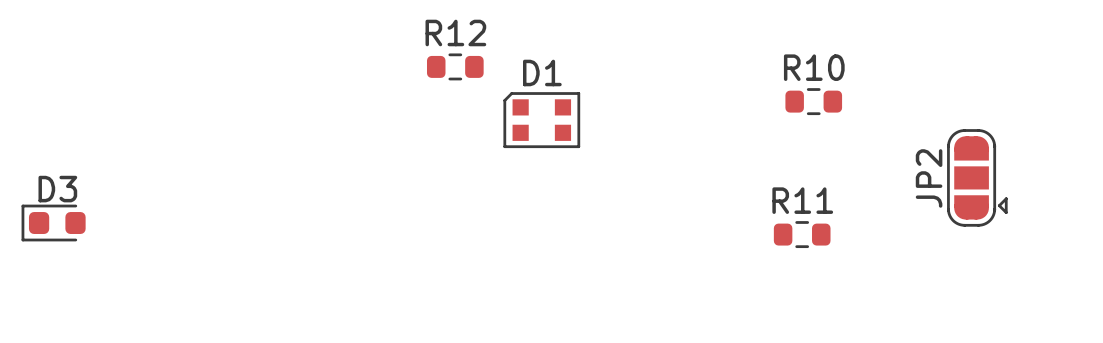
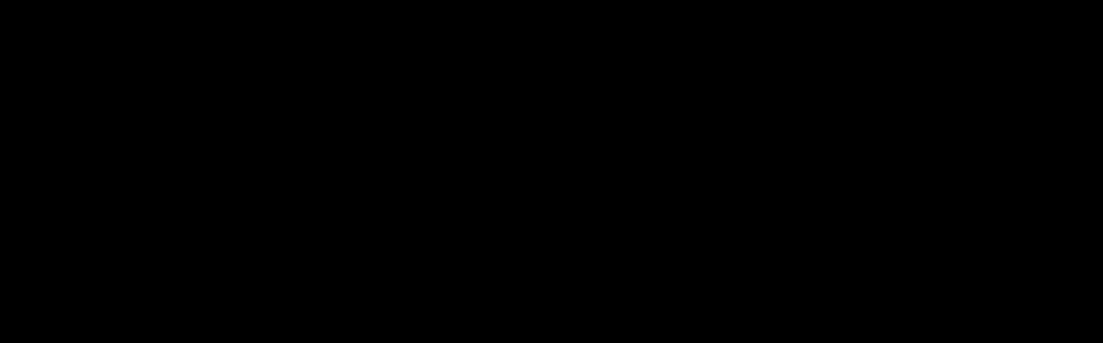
R12: (455, 66) -> none
R10: (813, 101) -> none
D1: (541, 120) -> none
JP2: (977, 177) -> none
D3: (53, 223) -> none
R11: (802, 234) -> none

